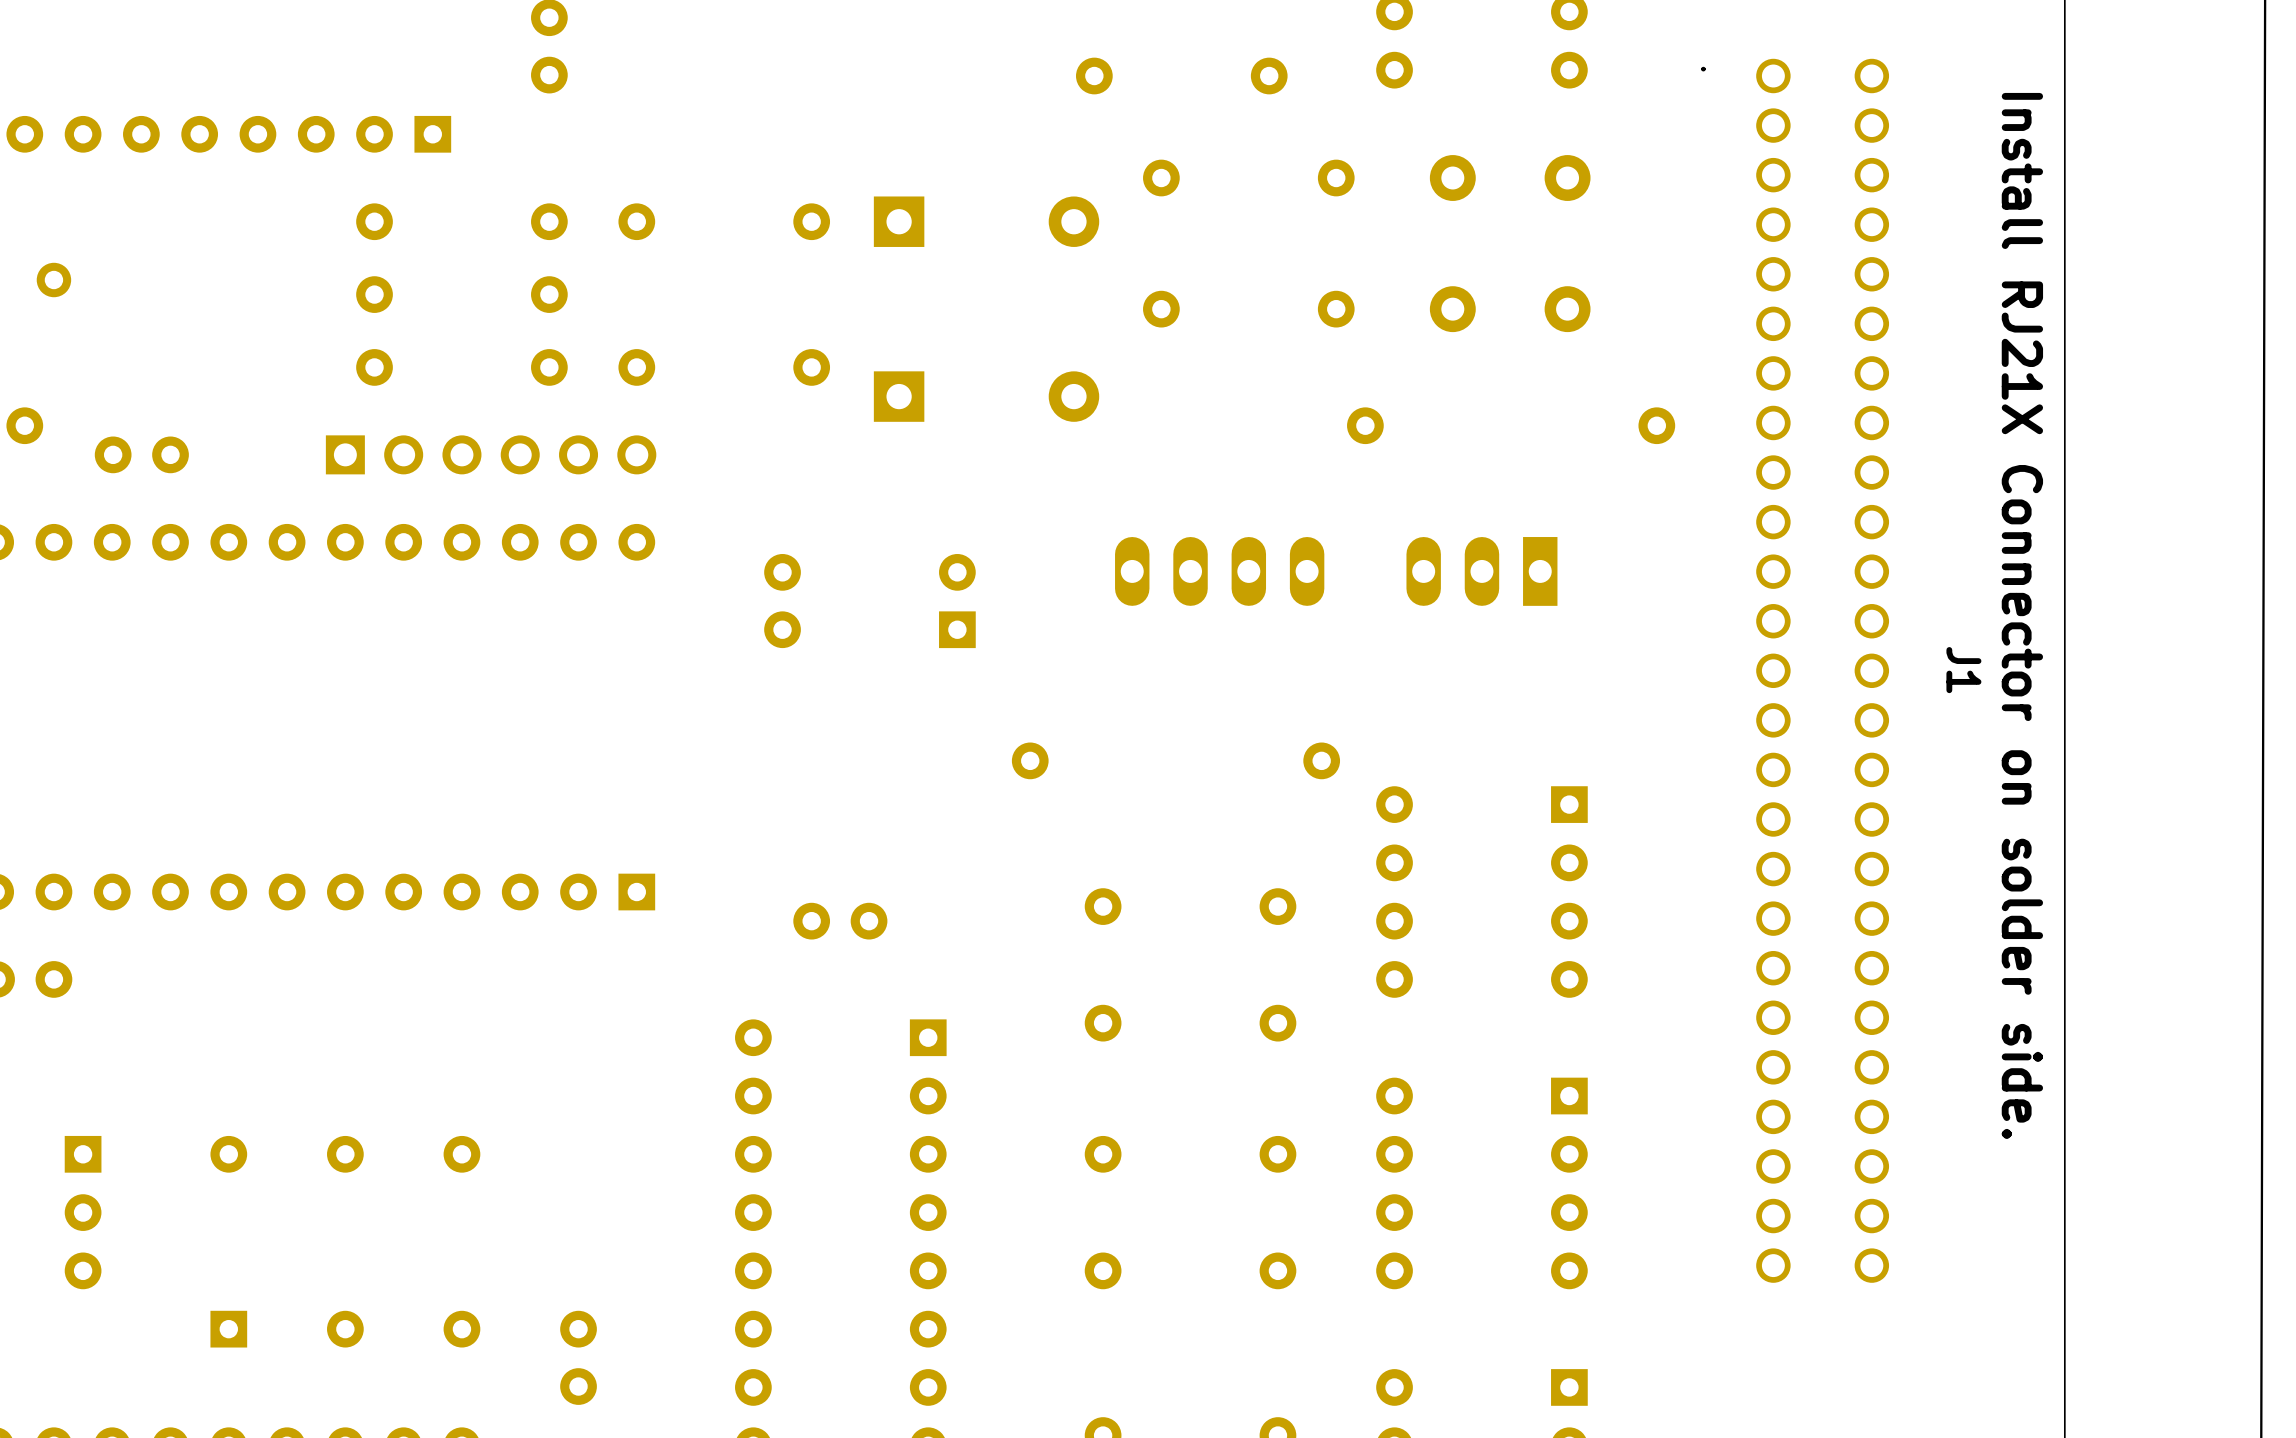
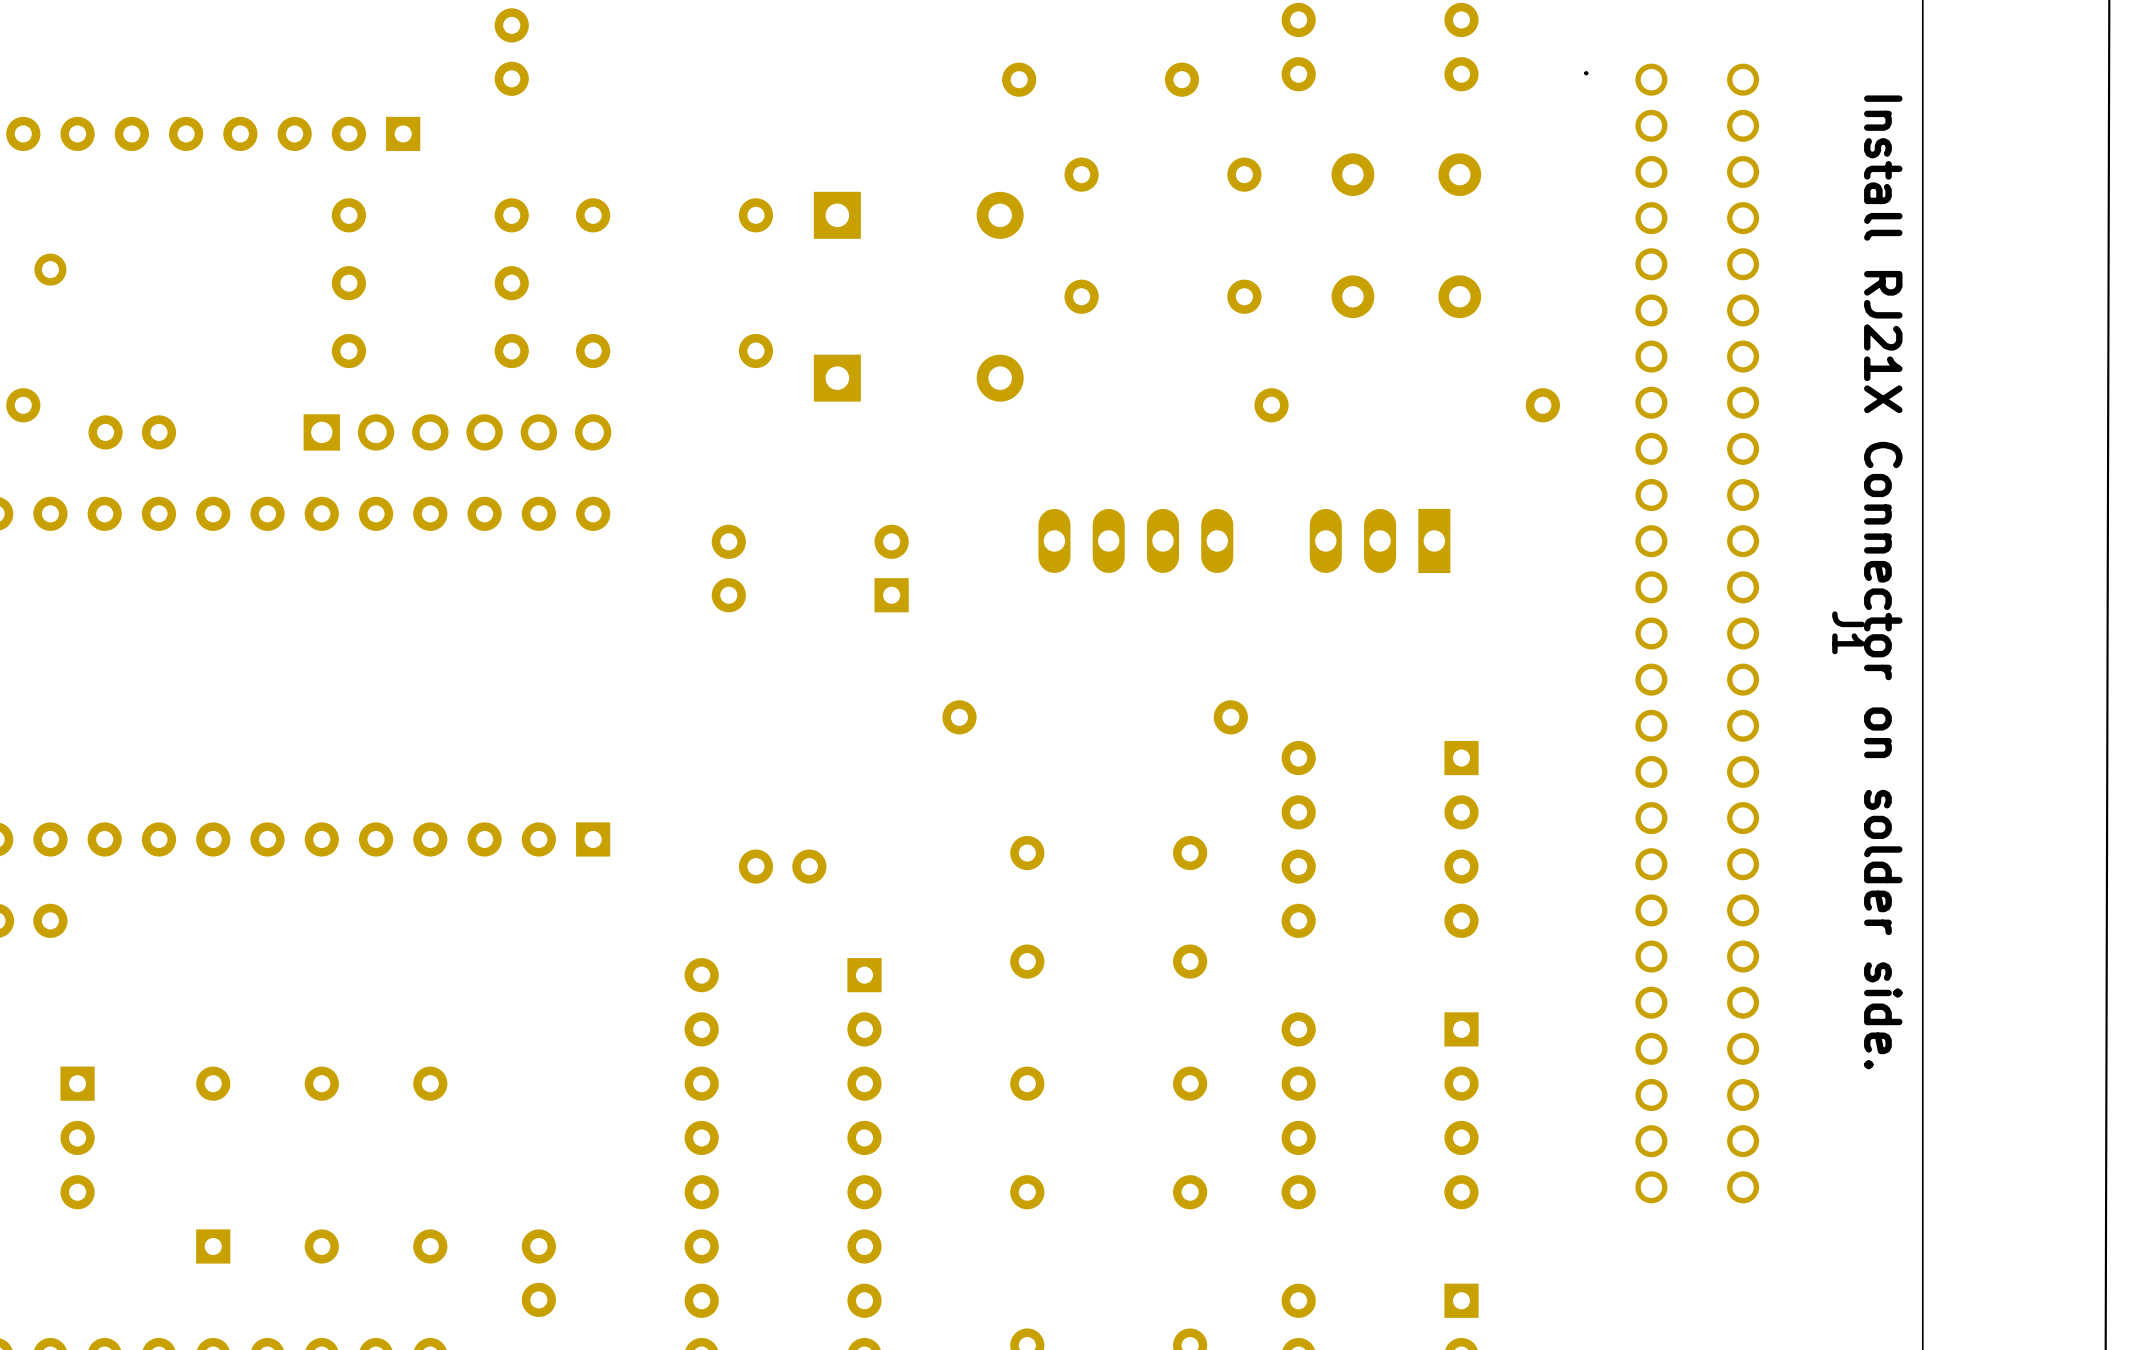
J1 name position: J1 (1963, 670) -> J1 (1848, 632)

